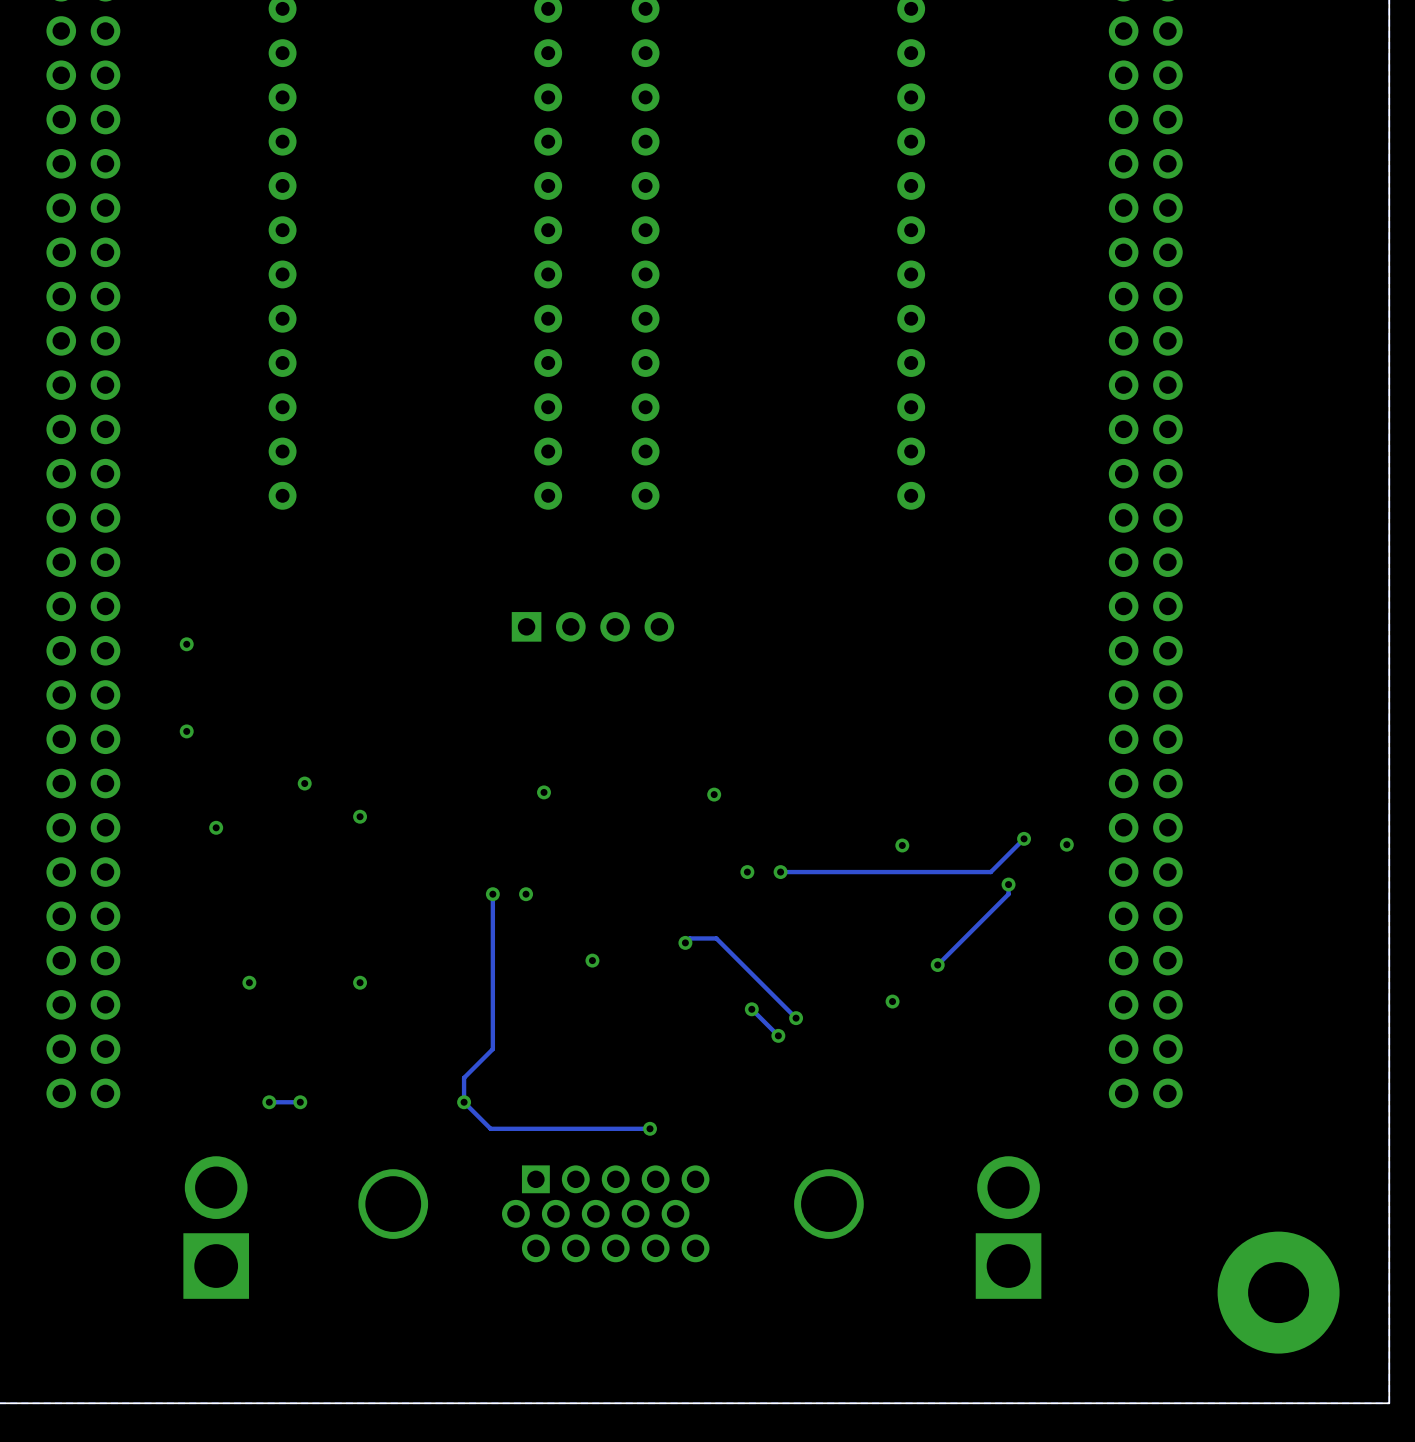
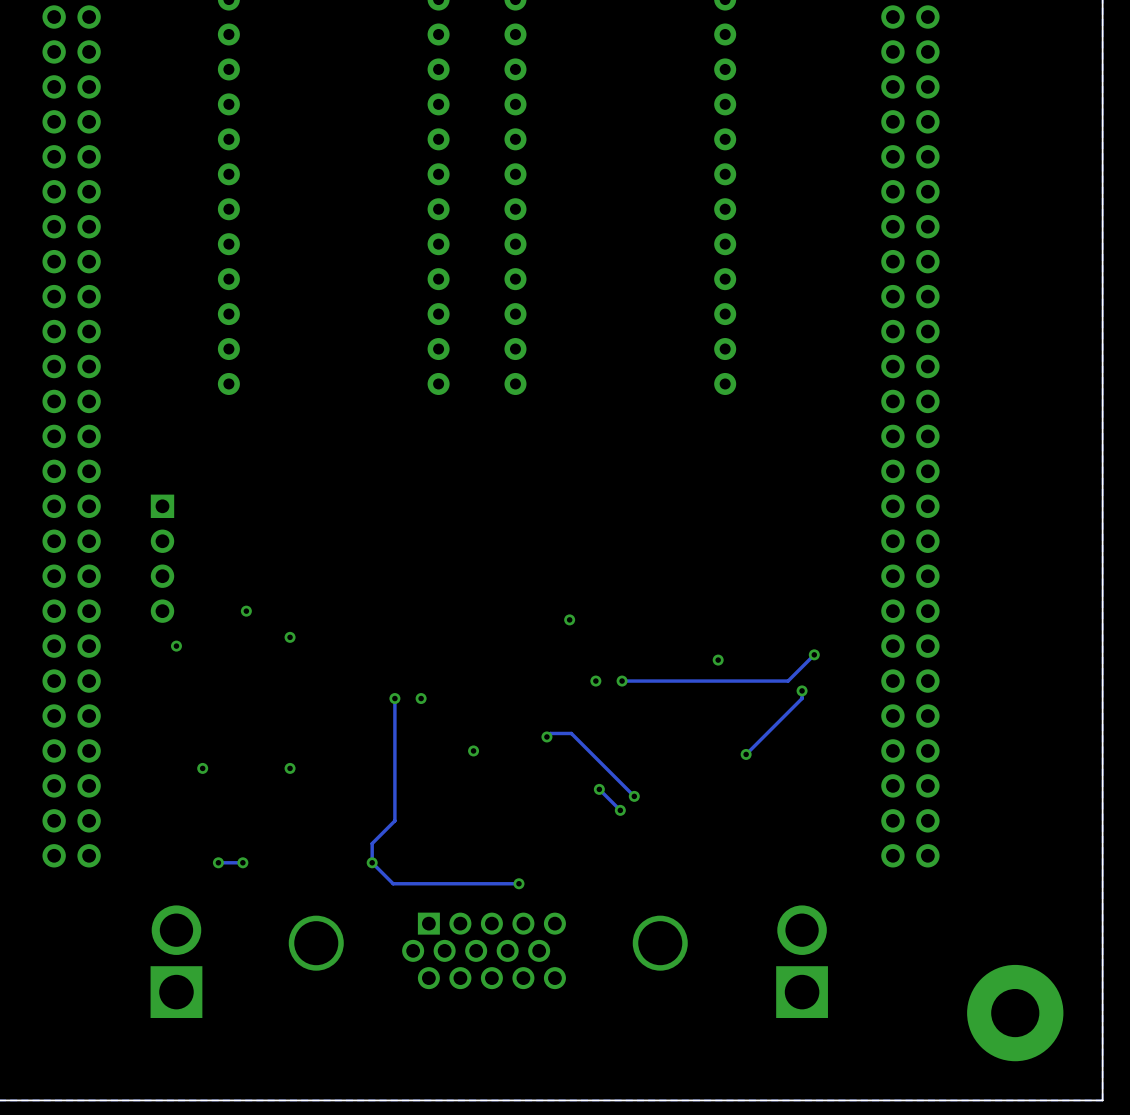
part rotation: 0° (592, 626) -> 90° clockwise (162, 558)
part position: (592, 626) -> (162, 558)
via: (186, 644) -> none
via: (186, 731) -> none
via: (544, 792) -> none
via: (1066, 844) -> none
via: (892, 1001) -> none

